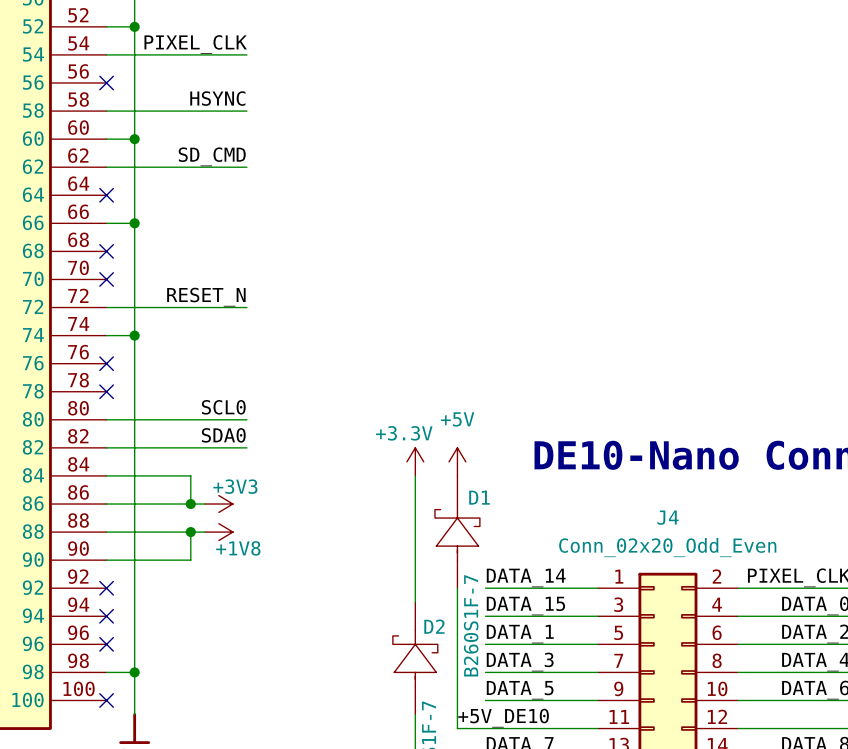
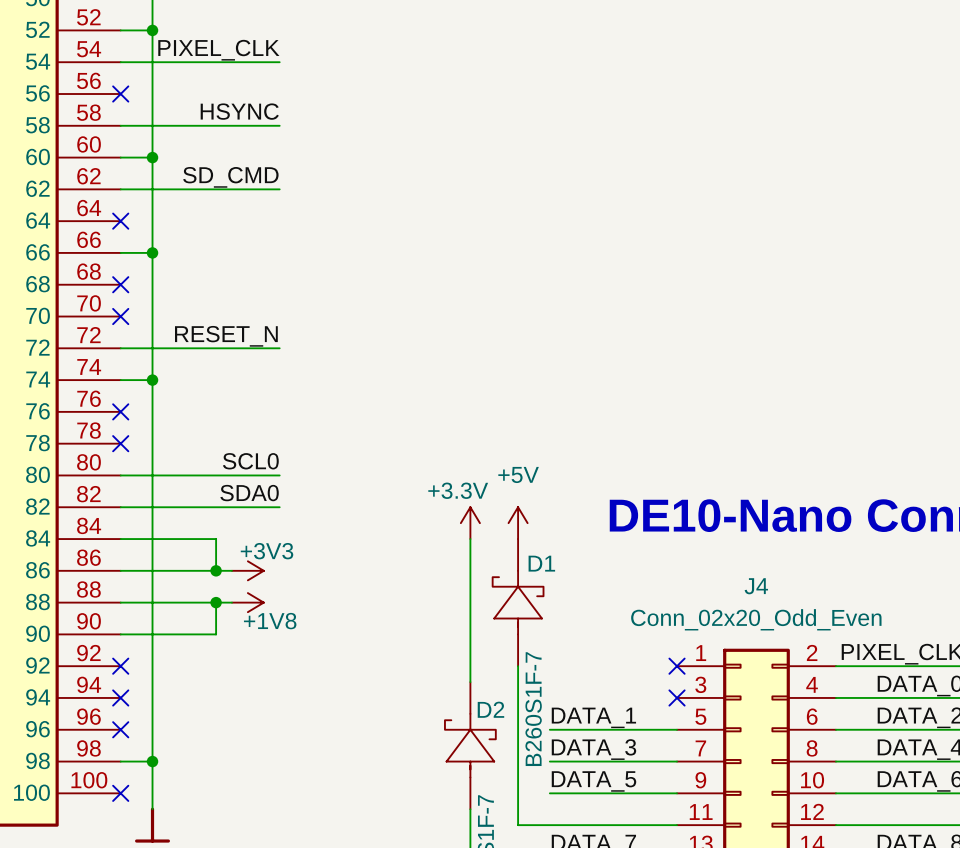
label: DATA_14 (526, 577) -> none
wire: (485, 588) (597, 588) -> none
no-connect mark: none -> (677, 666)
label: DATA_15 (525, 606) -> none
wire: (485, 616) (597, 616) -> none
no-connect mark: none -> (677, 697)
label: +5V_DE10 (503, 718) -> none

